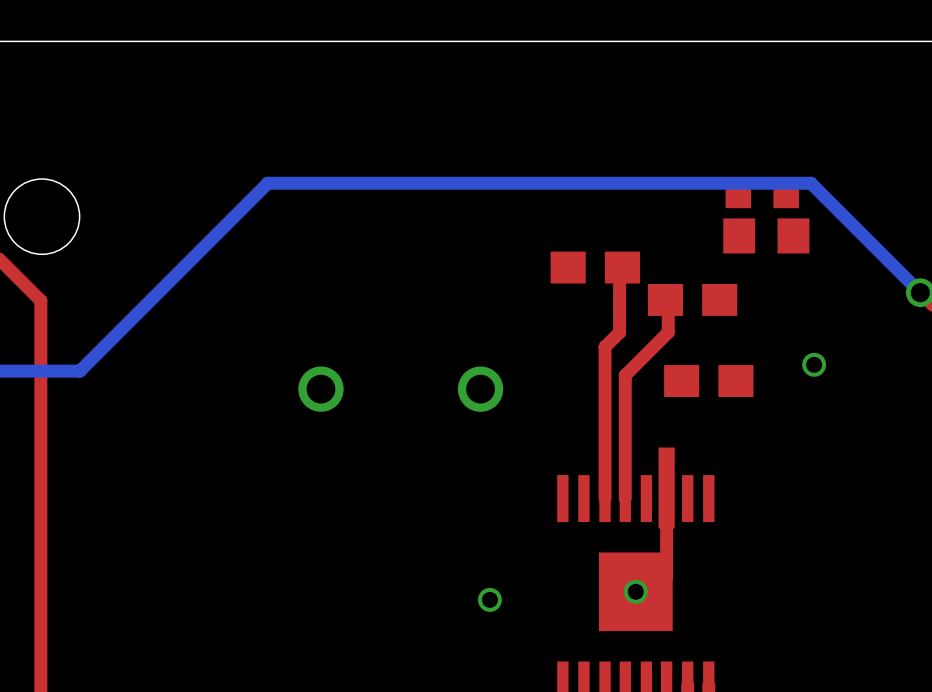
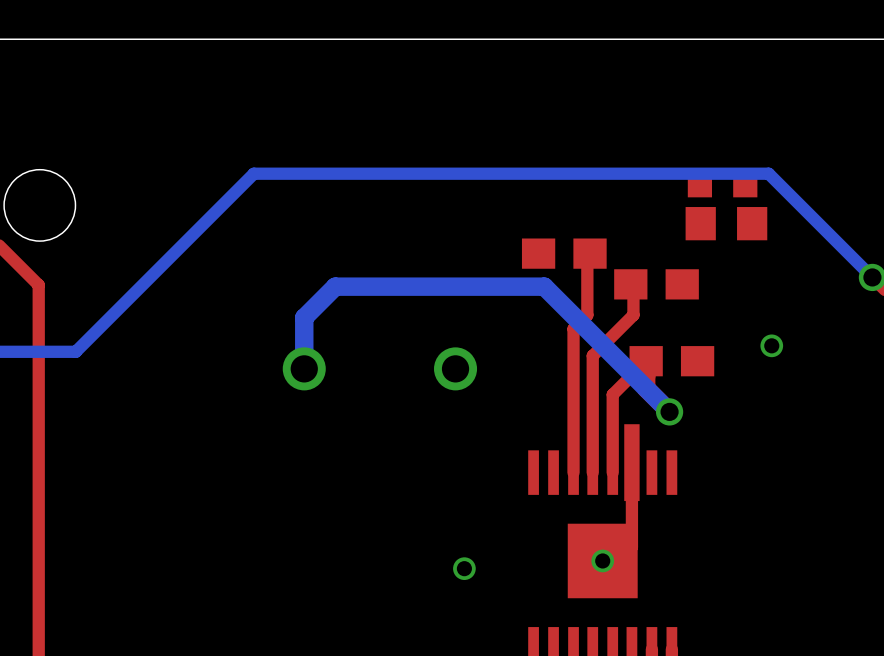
bottom track: none -> (304, 368) (304, 317) (335, 286) (544, 286) (669, 411)
top track: none -> (646, 376) (630, 376) (612, 394) (612, 472)
via: none -> (669, 411)

